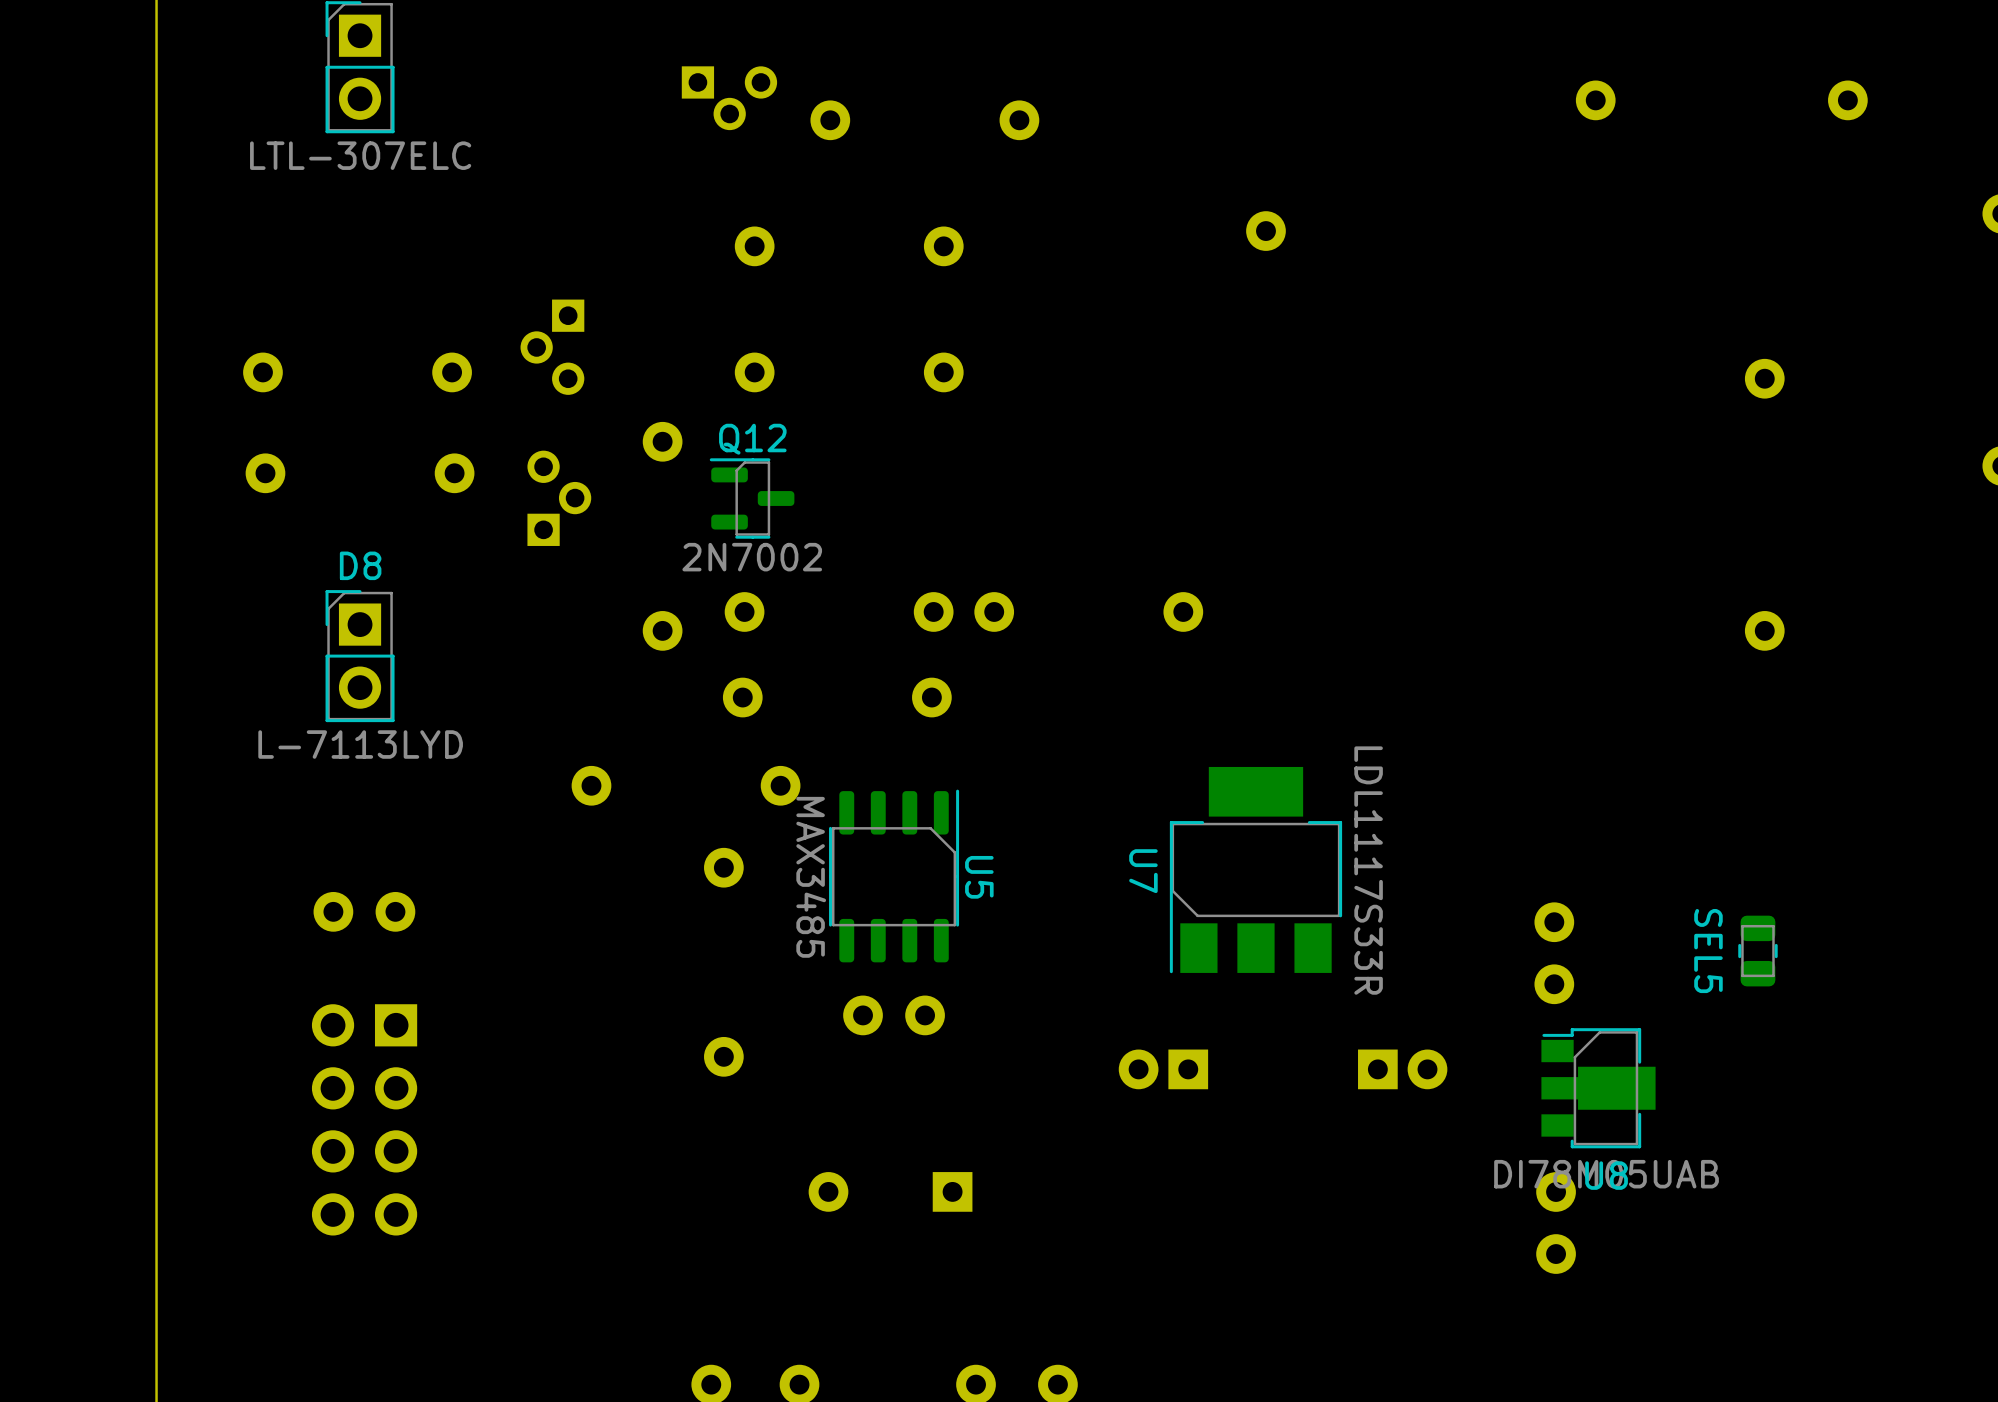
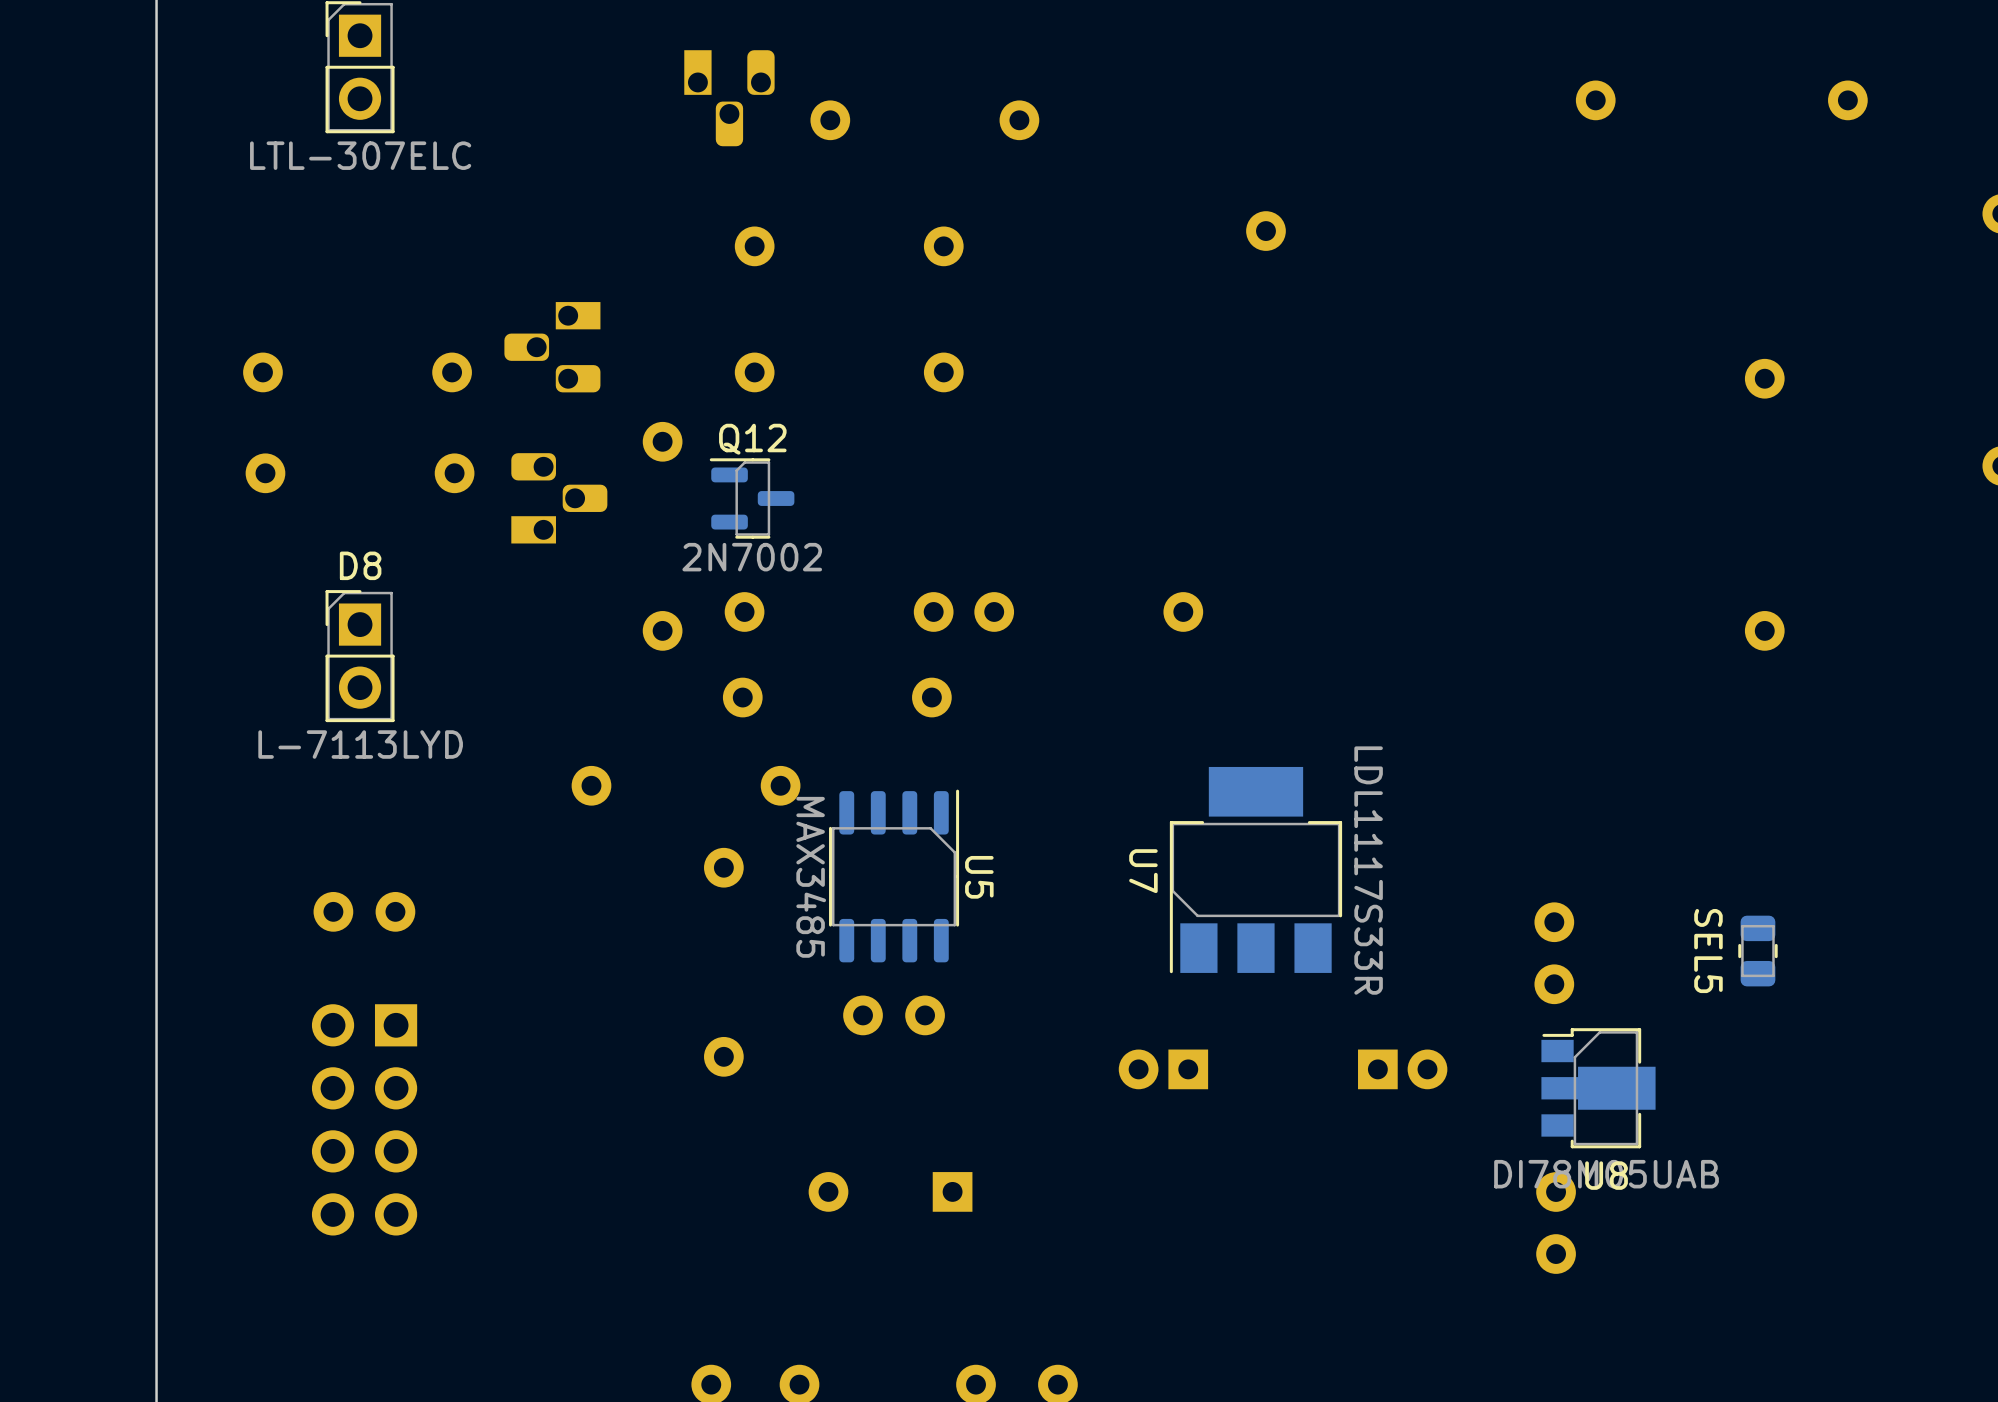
part footprint: [681, 66, 778, 131] -> [684, 50, 775, 147]
part footprint: [520, 299, 585, 395] -> [504, 302, 601, 393]
part footprint: [527, 450, 592, 546] -> [511, 453, 608, 544]

